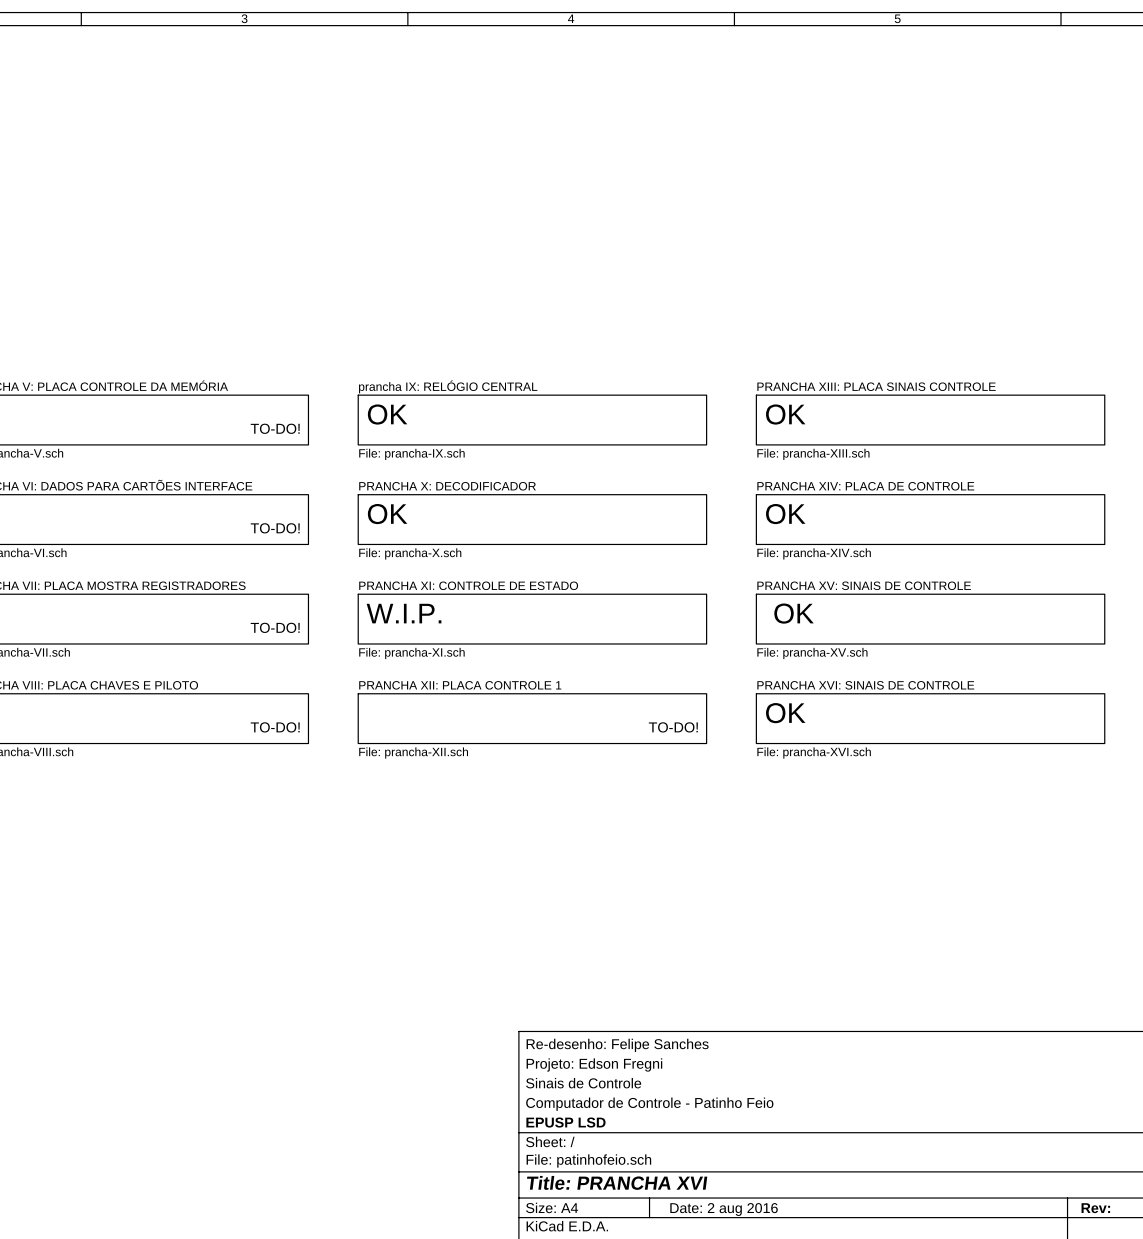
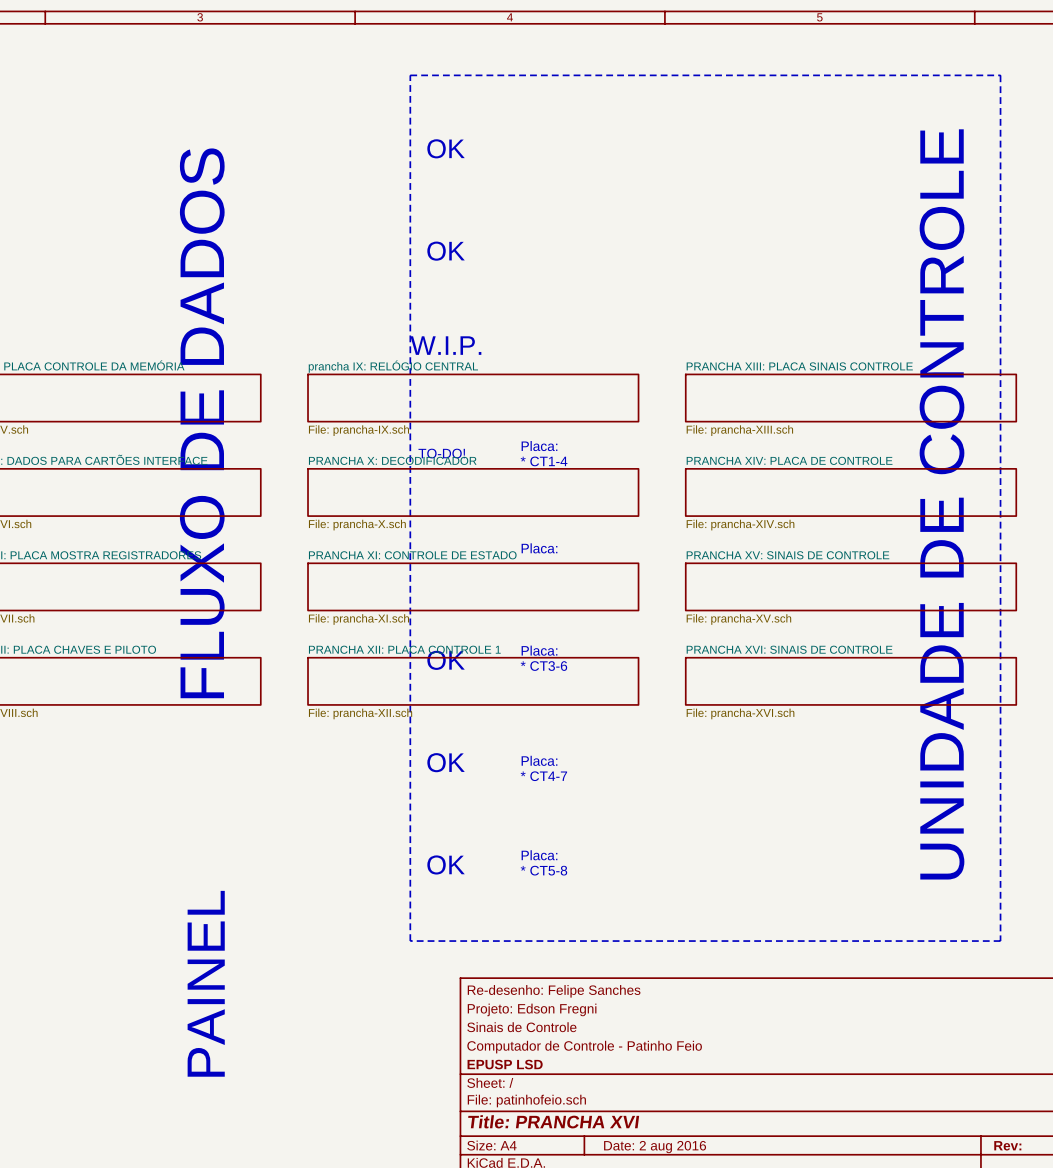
line: none -> (410, 75) (1000, 75) (1000, 941) (410, 941) (410, 75)
text: none -> OK (446, 148)
text: none -> OK (446, 251)
text: none -> W.I.P. (445, 345)
text: OK (387, 414) -> none
text: OK (785, 414) -> none
text: TO-DO! (275, 428) -> none
text: none -> FLUXO DE DADOS (202, 423)
text: none -> Placa: (539, 446)
text: none -> TO-DO! (441, 453)
text: none -> * CT1-4 (544, 461)
text: OK (387, 514) -> none
text: OK (785, 514) -> none
text: TO-DO! (275, 528) -> none
text: none -> UNIDADE DE CONTROLE (942, 504)
text: none -> Placa: (539, 548)
text: W.I.P. (404, 613) -> none
text: OK (794, 613) -> none
text: TO-DO! (275, 627) -> none
text: none -> Placa: (539, 650)
text: none -> OK (446, 660)
text: none -> * CT3-6 (543, 666)
text: OK (785, 713) -> none
text: TO-DO! (275, 727) -> none
text: TO-DO! (673, 727) -> none
text: none -> Placa: (539, 760)
text: none -> OK (446, 762)
text: none -> * CT4-7 (543, 776)
text: none -> Placa: (539, 855)
text: none -> OK (446, 864)
text: none -> * CT5-8 (543, 870)
text: none -> PAINEL (206, 983)

